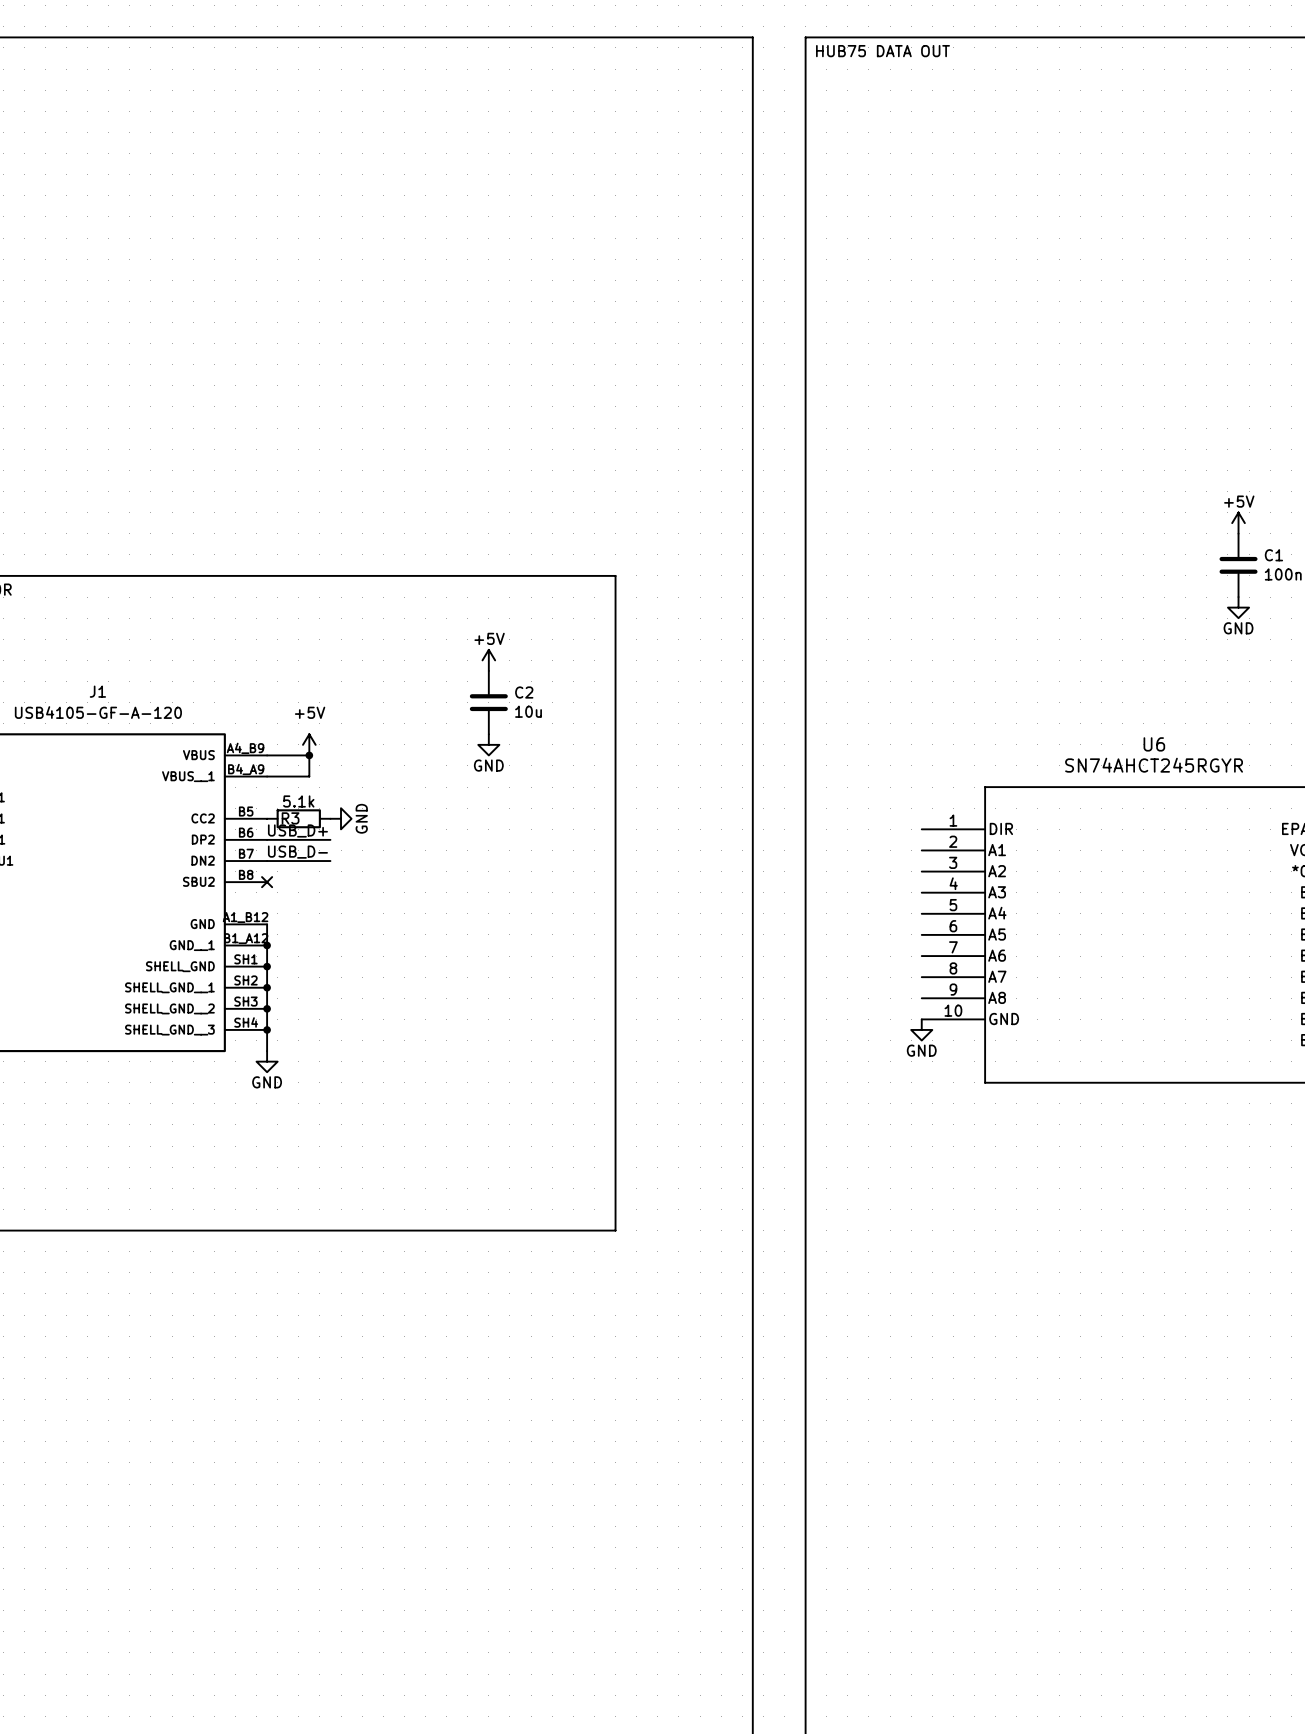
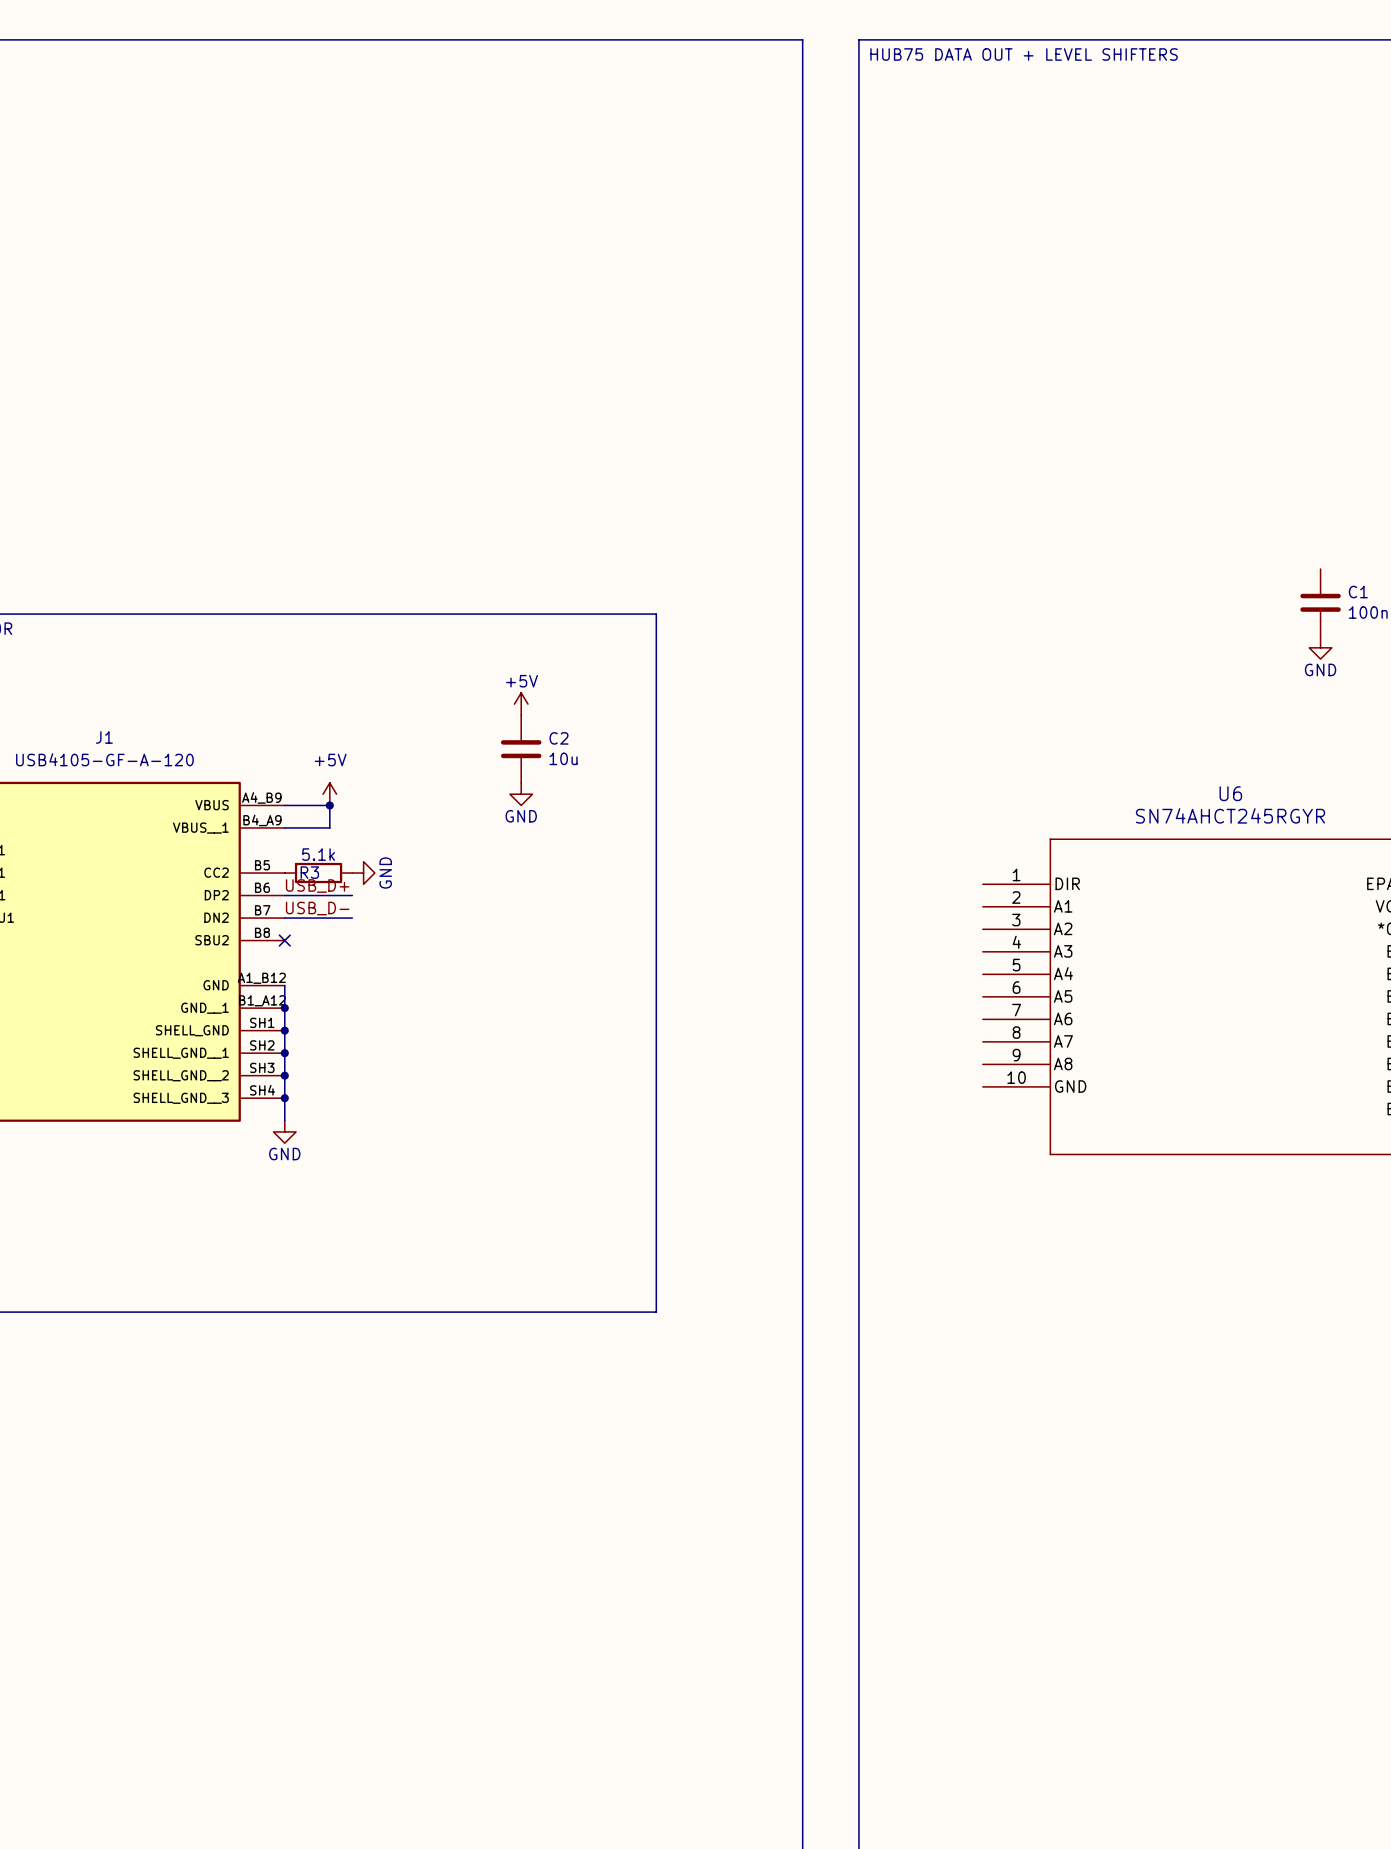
text: HUB75 DATA OUT (882, 51) -> HUB75 DATA OUT + LEVEL SHIFTERS (1024, 54)
power symbol: +5V (1238, 523) -> none
power symbol: GND (921, 1029) -> none

